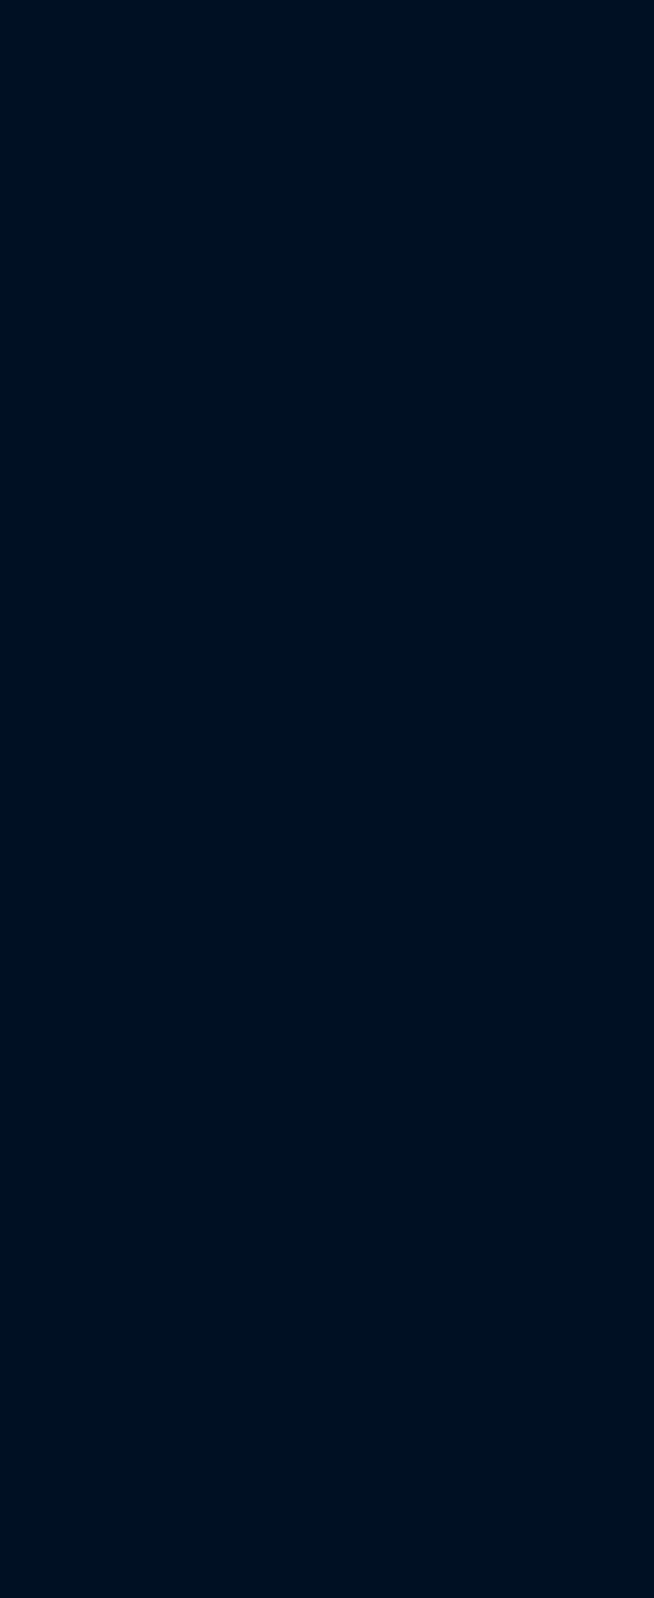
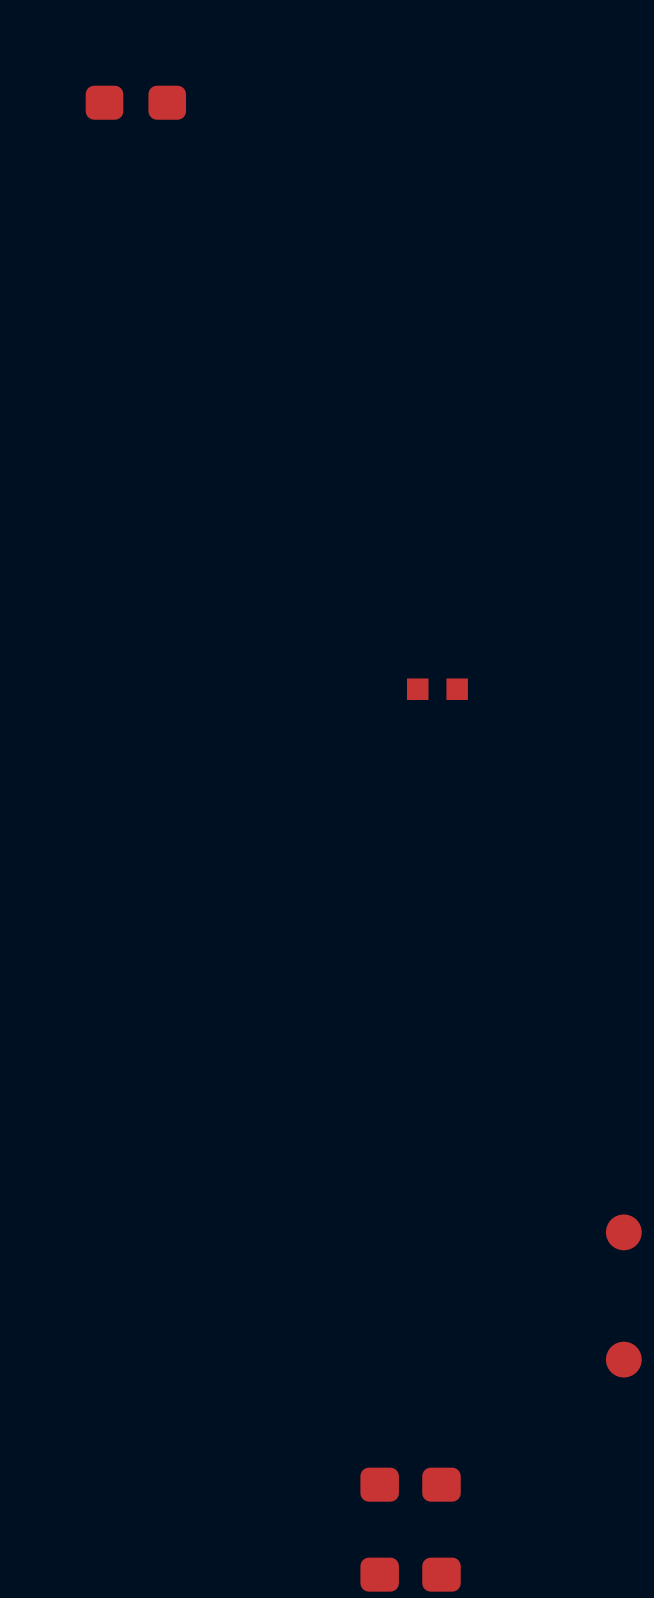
part: none -> (135, 102)
part: none -> (437, 689)
part: none -> (623, 1232)
part: none -> (623, 1359)
part: none -> (410, 1484)
part: none -> (410, 1574)

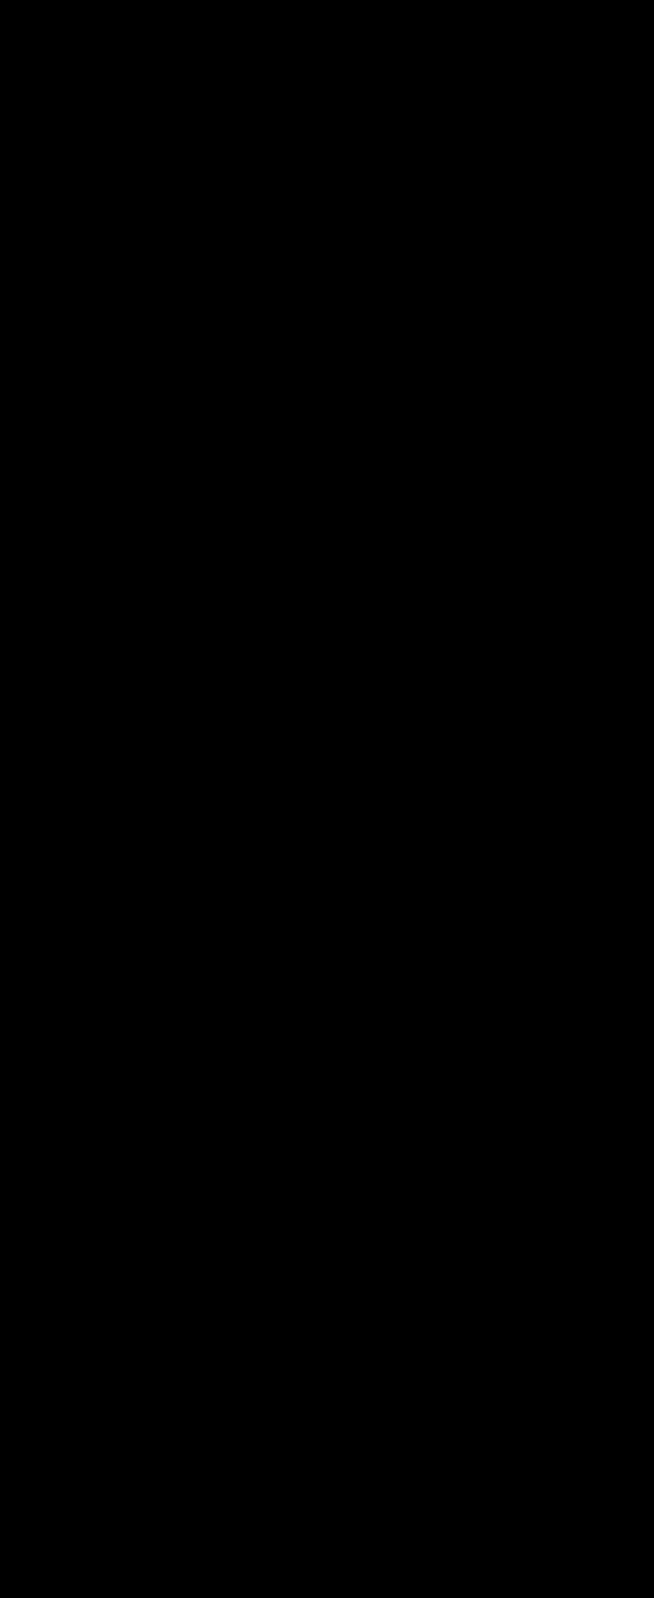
part: (135, 102) -> none
part: (437, 689) -> none
part: (623, 1232) -> none
part: (623, 1359) -> none
part: (410, 1484) -> none
part: (410, 1574) -> none

